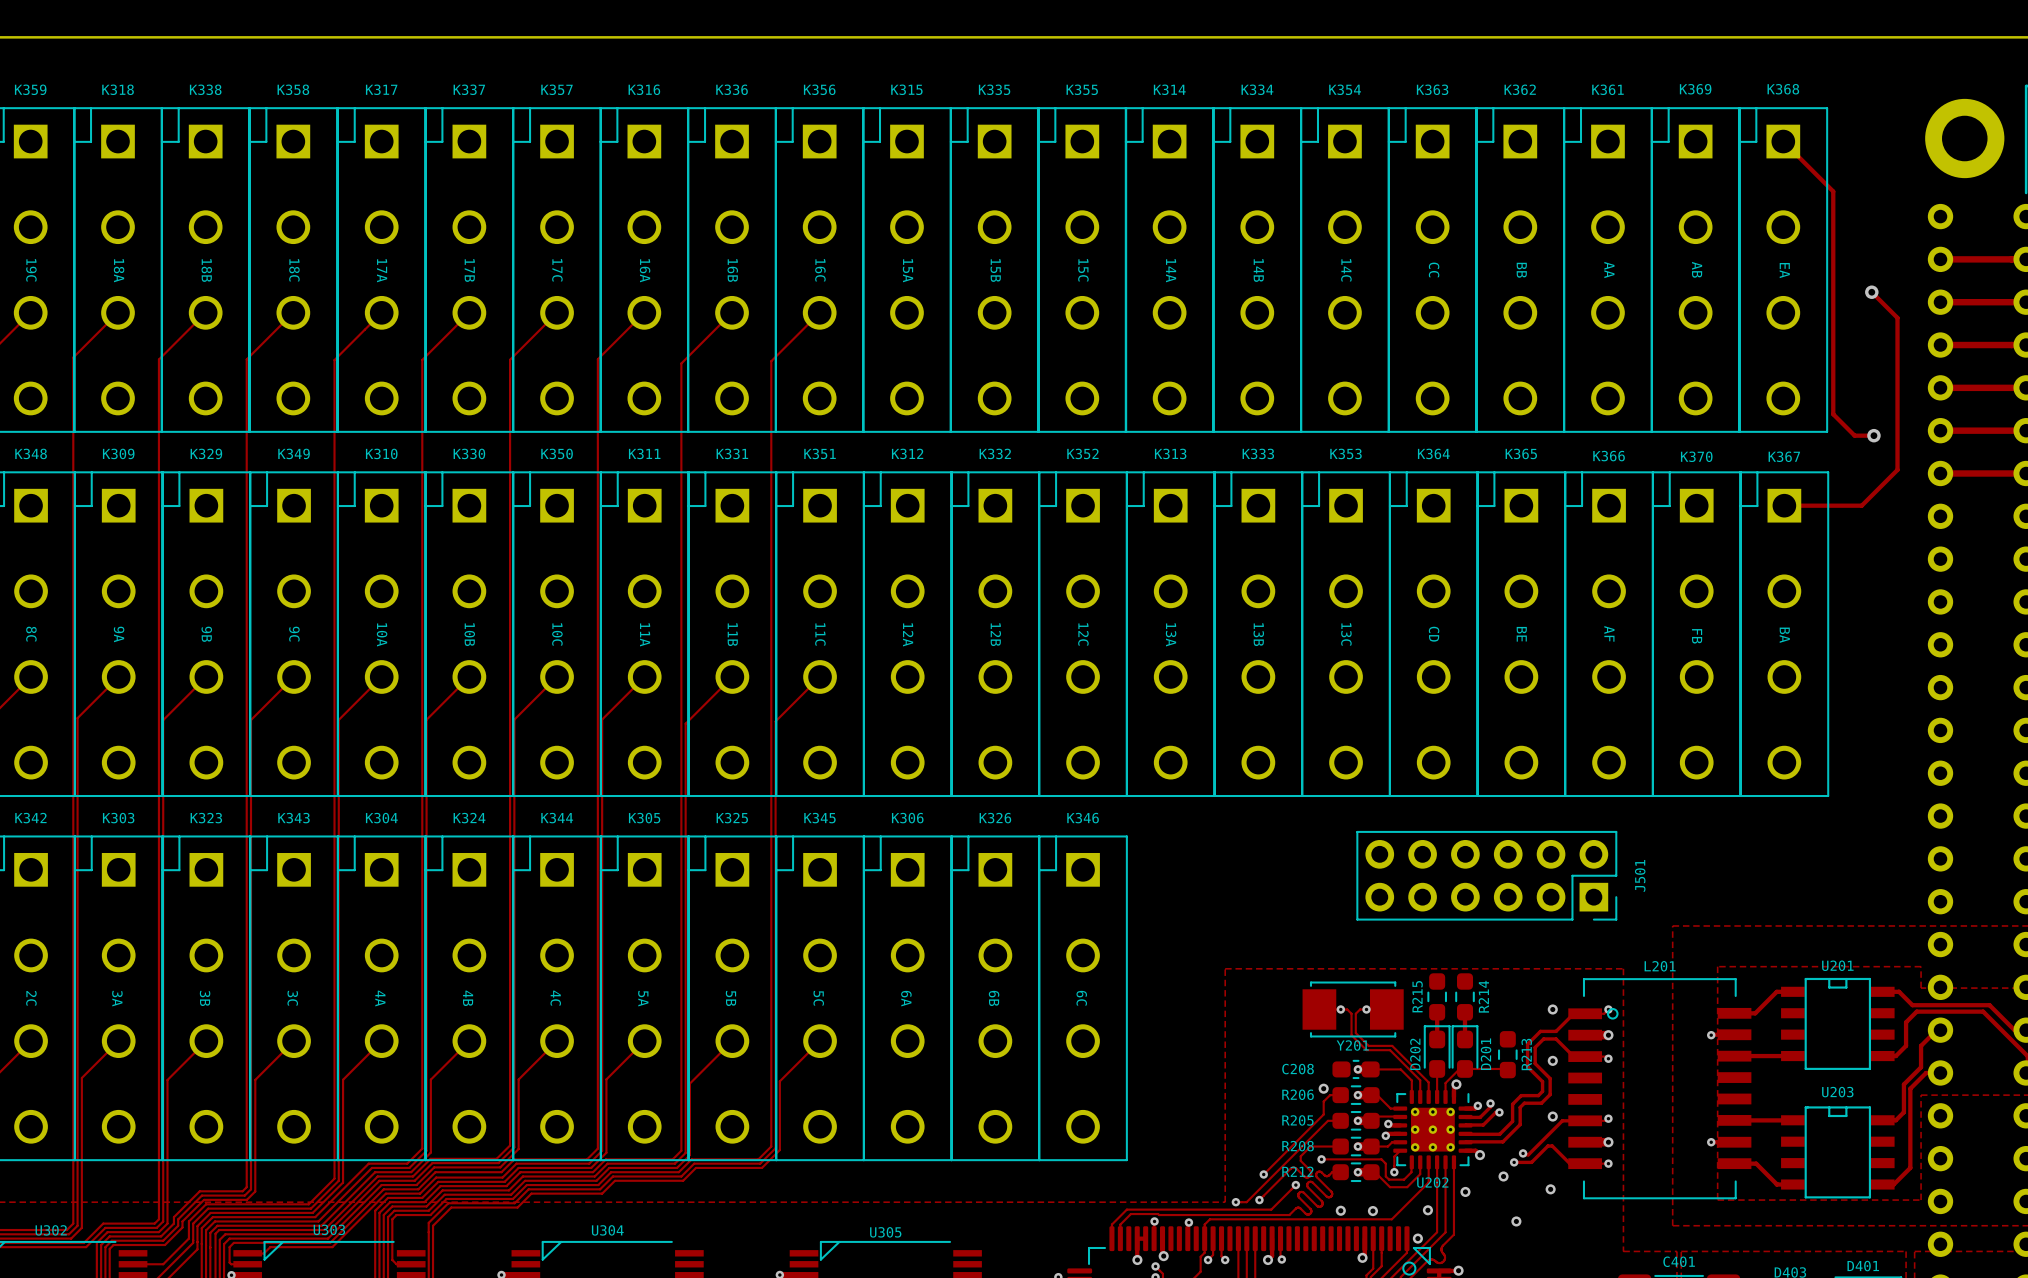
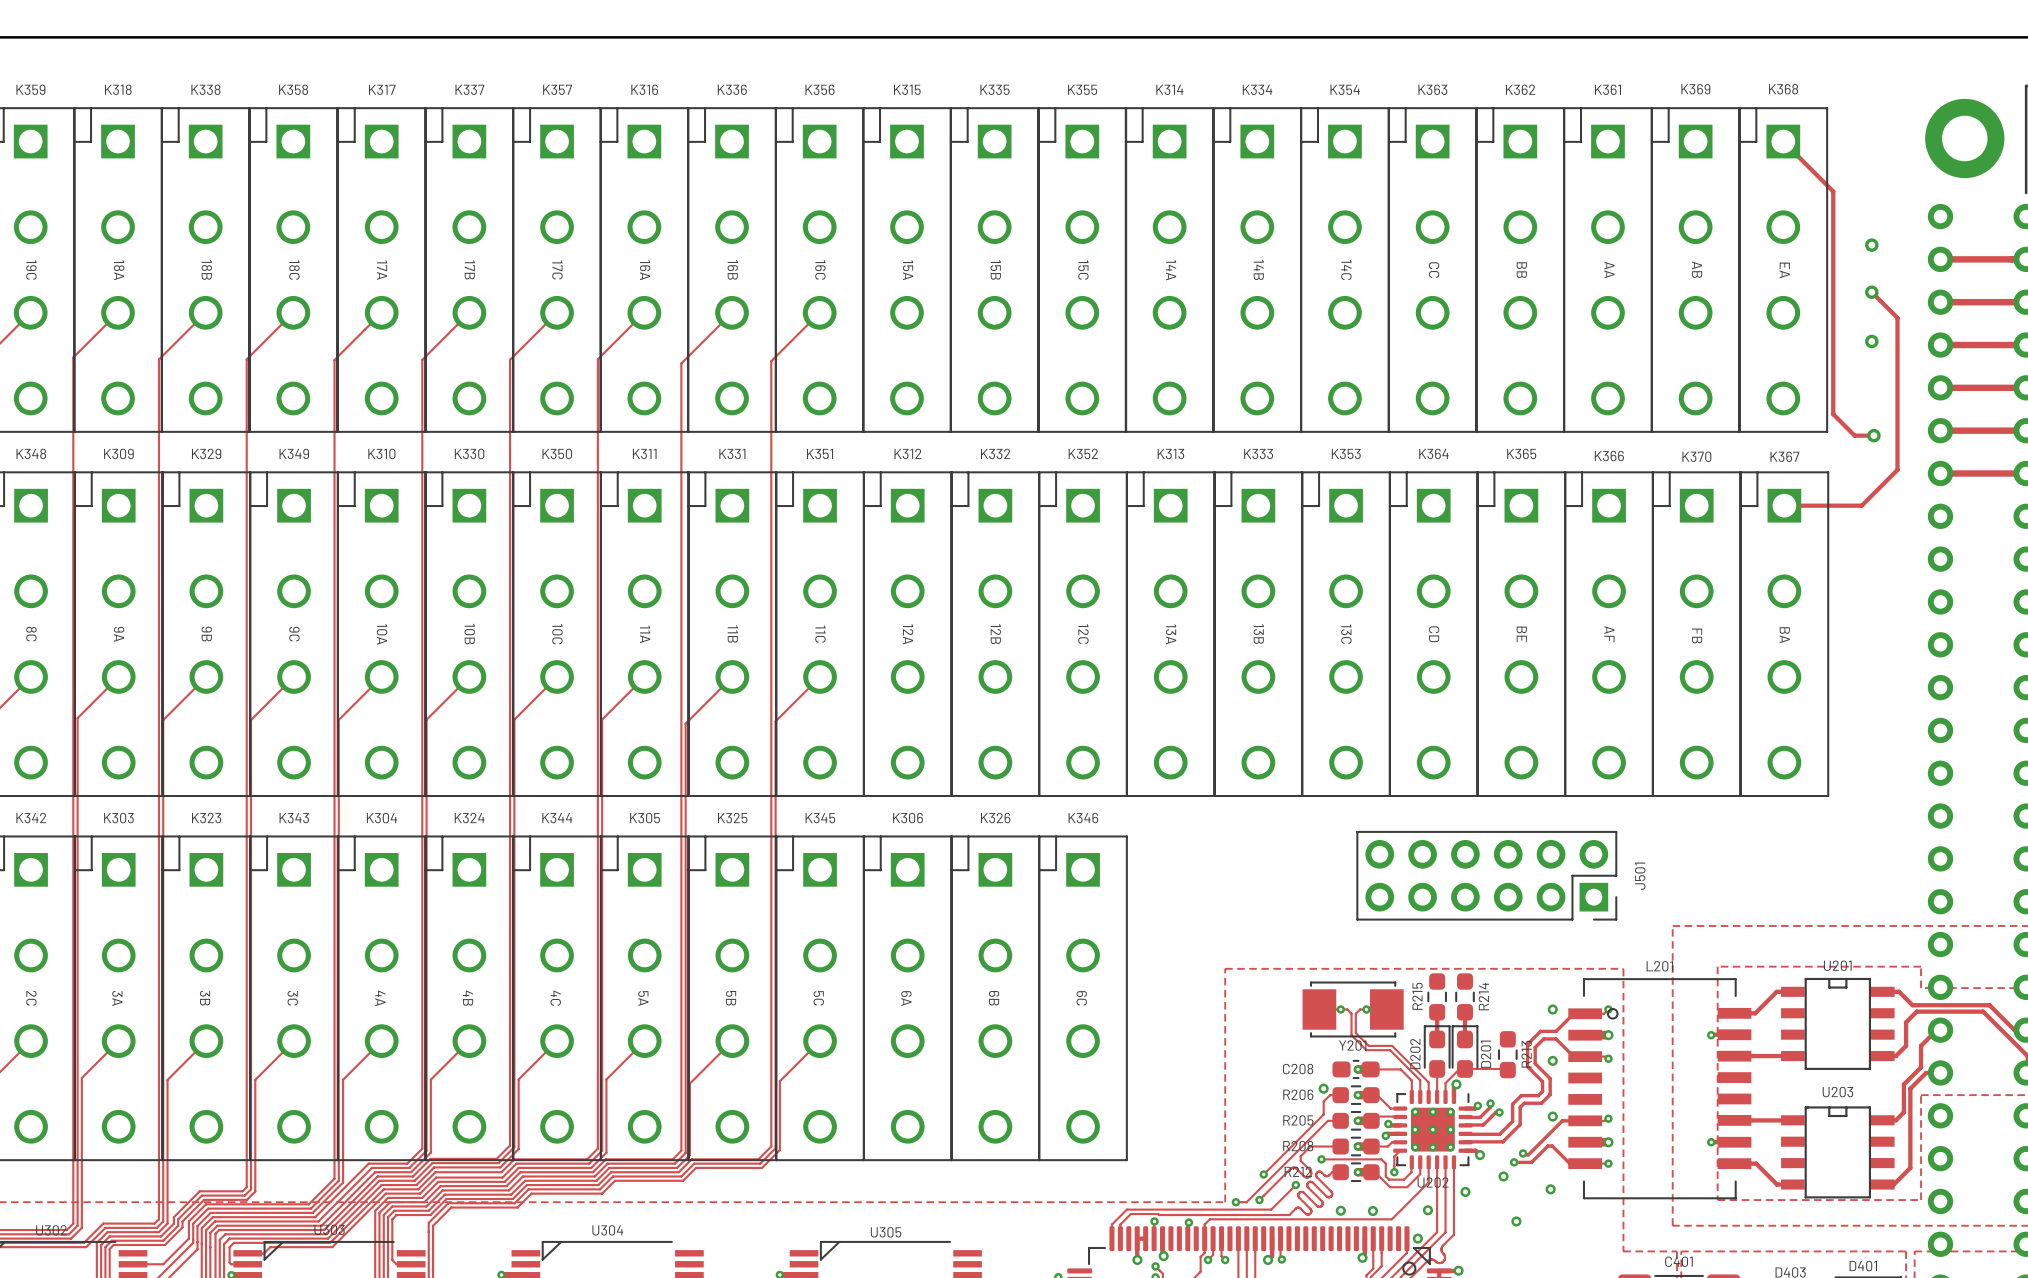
via: none -> (1871, 245)
via: none -> (1871, 341)

